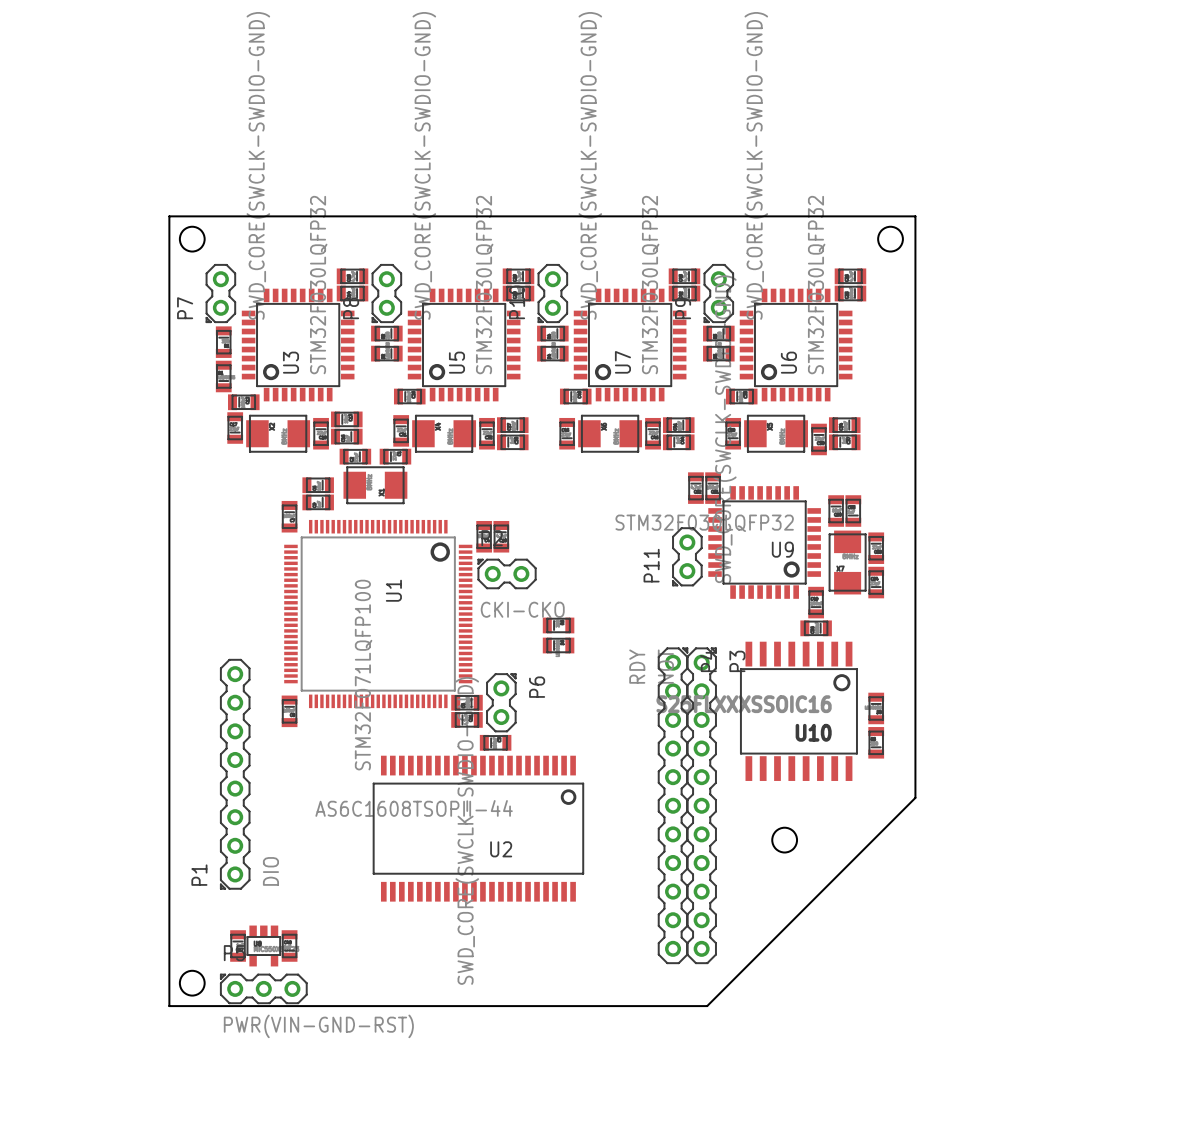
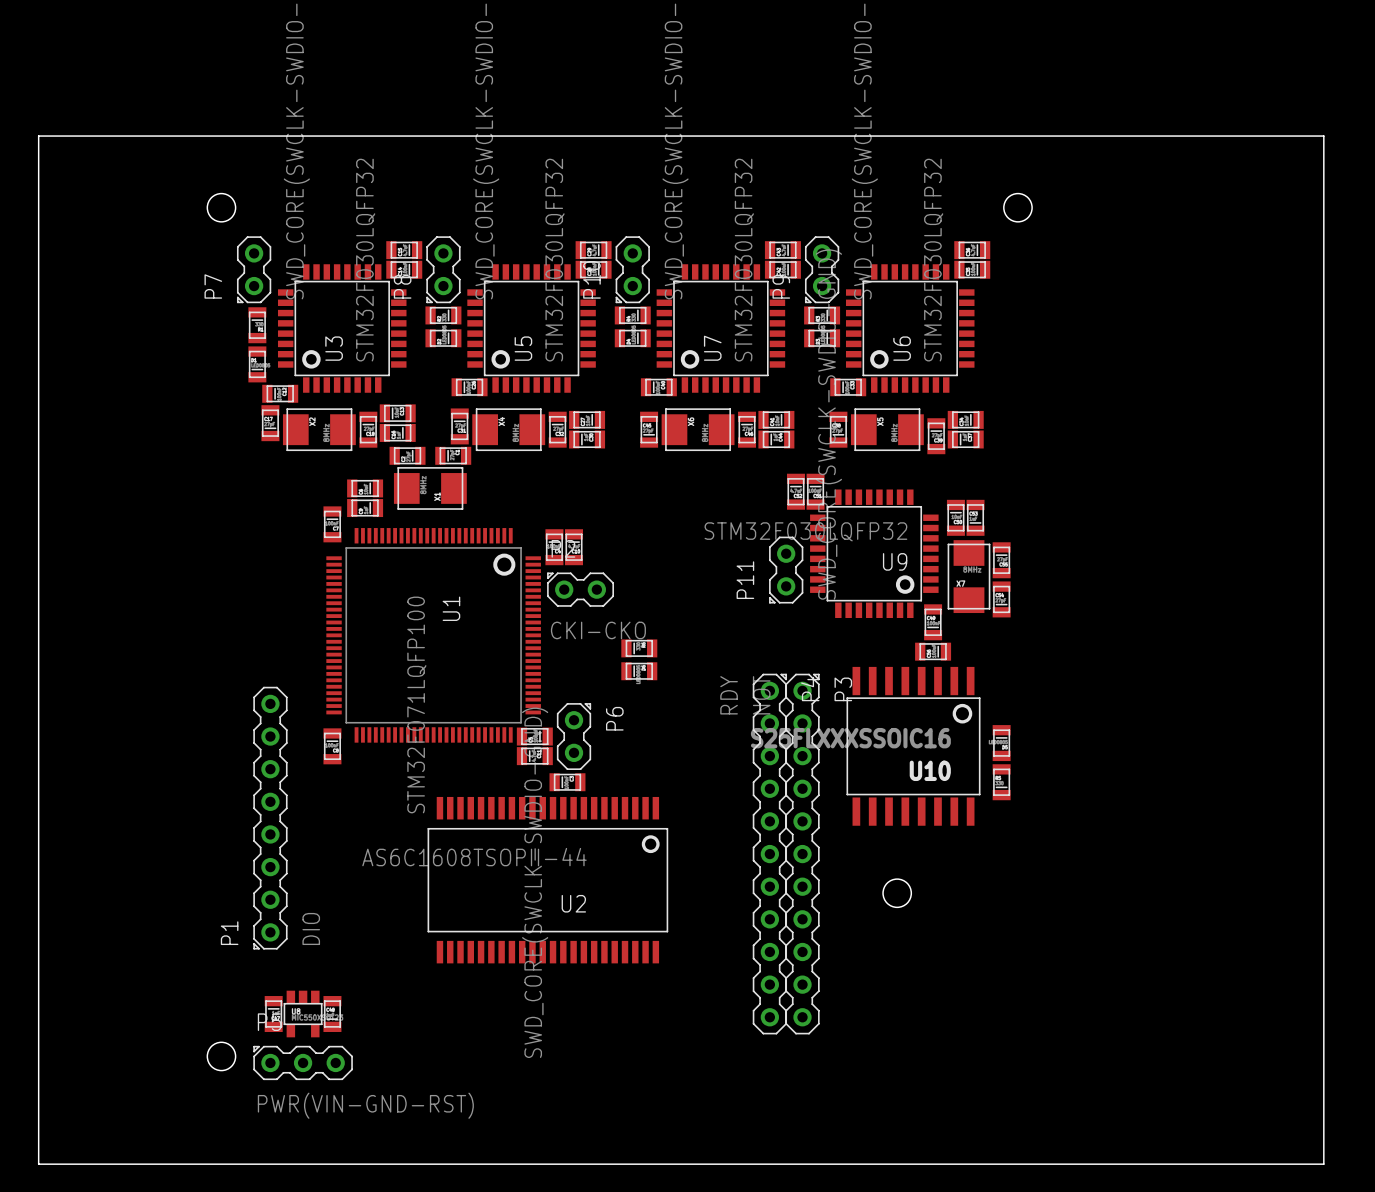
board edge: (169, 216) (915, 216) (915, 797) (707, 1006) (169, 1006) (169, 216) -> (38, 136) (38, 1164) (1323, 1164) (1323, 136) (38, 136)

